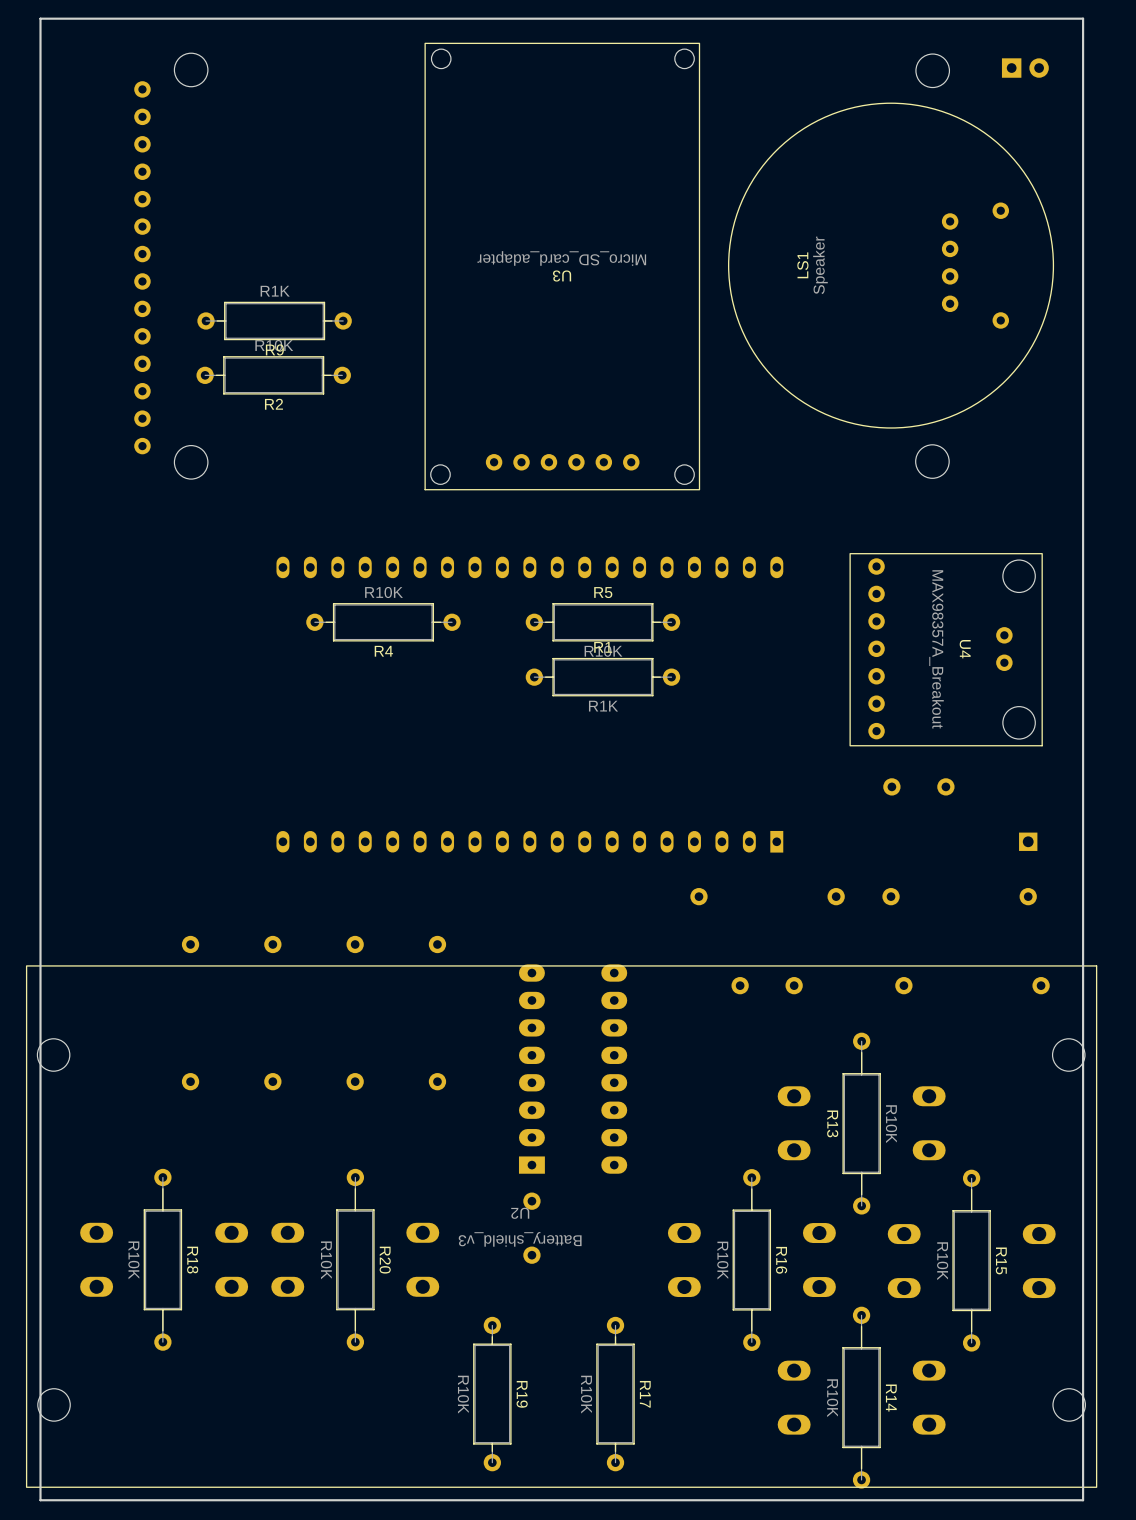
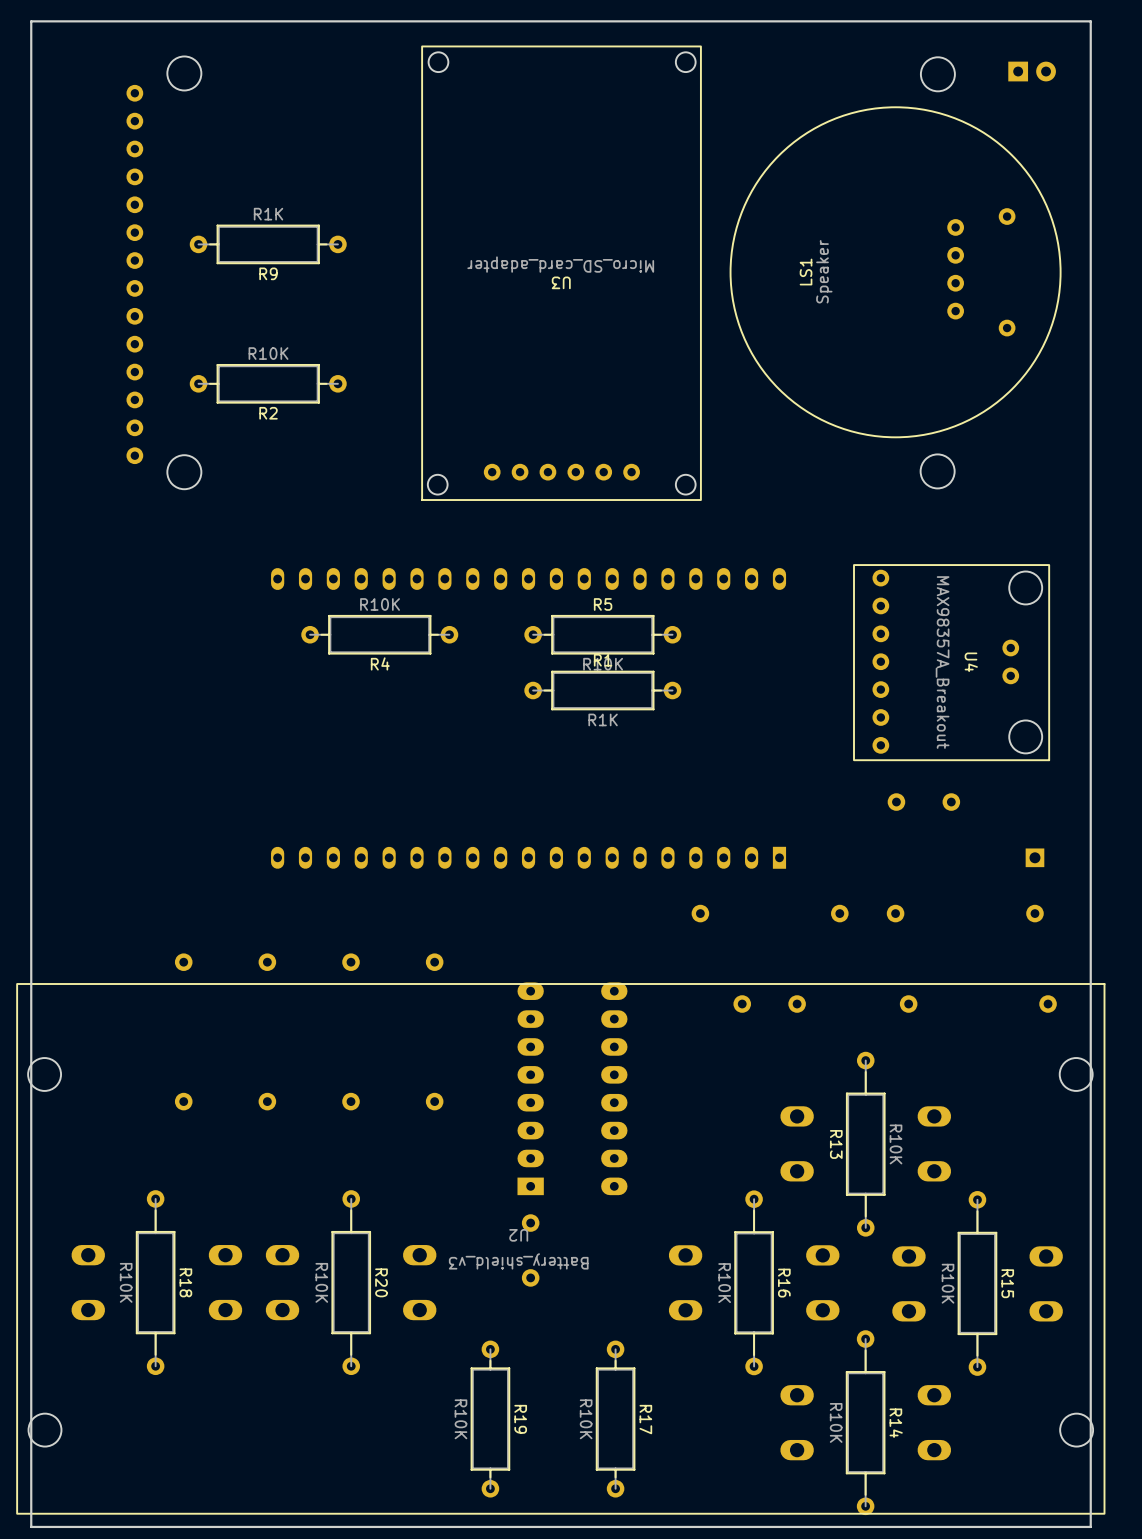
R9 position: (274, 320) -> (268, 244)

